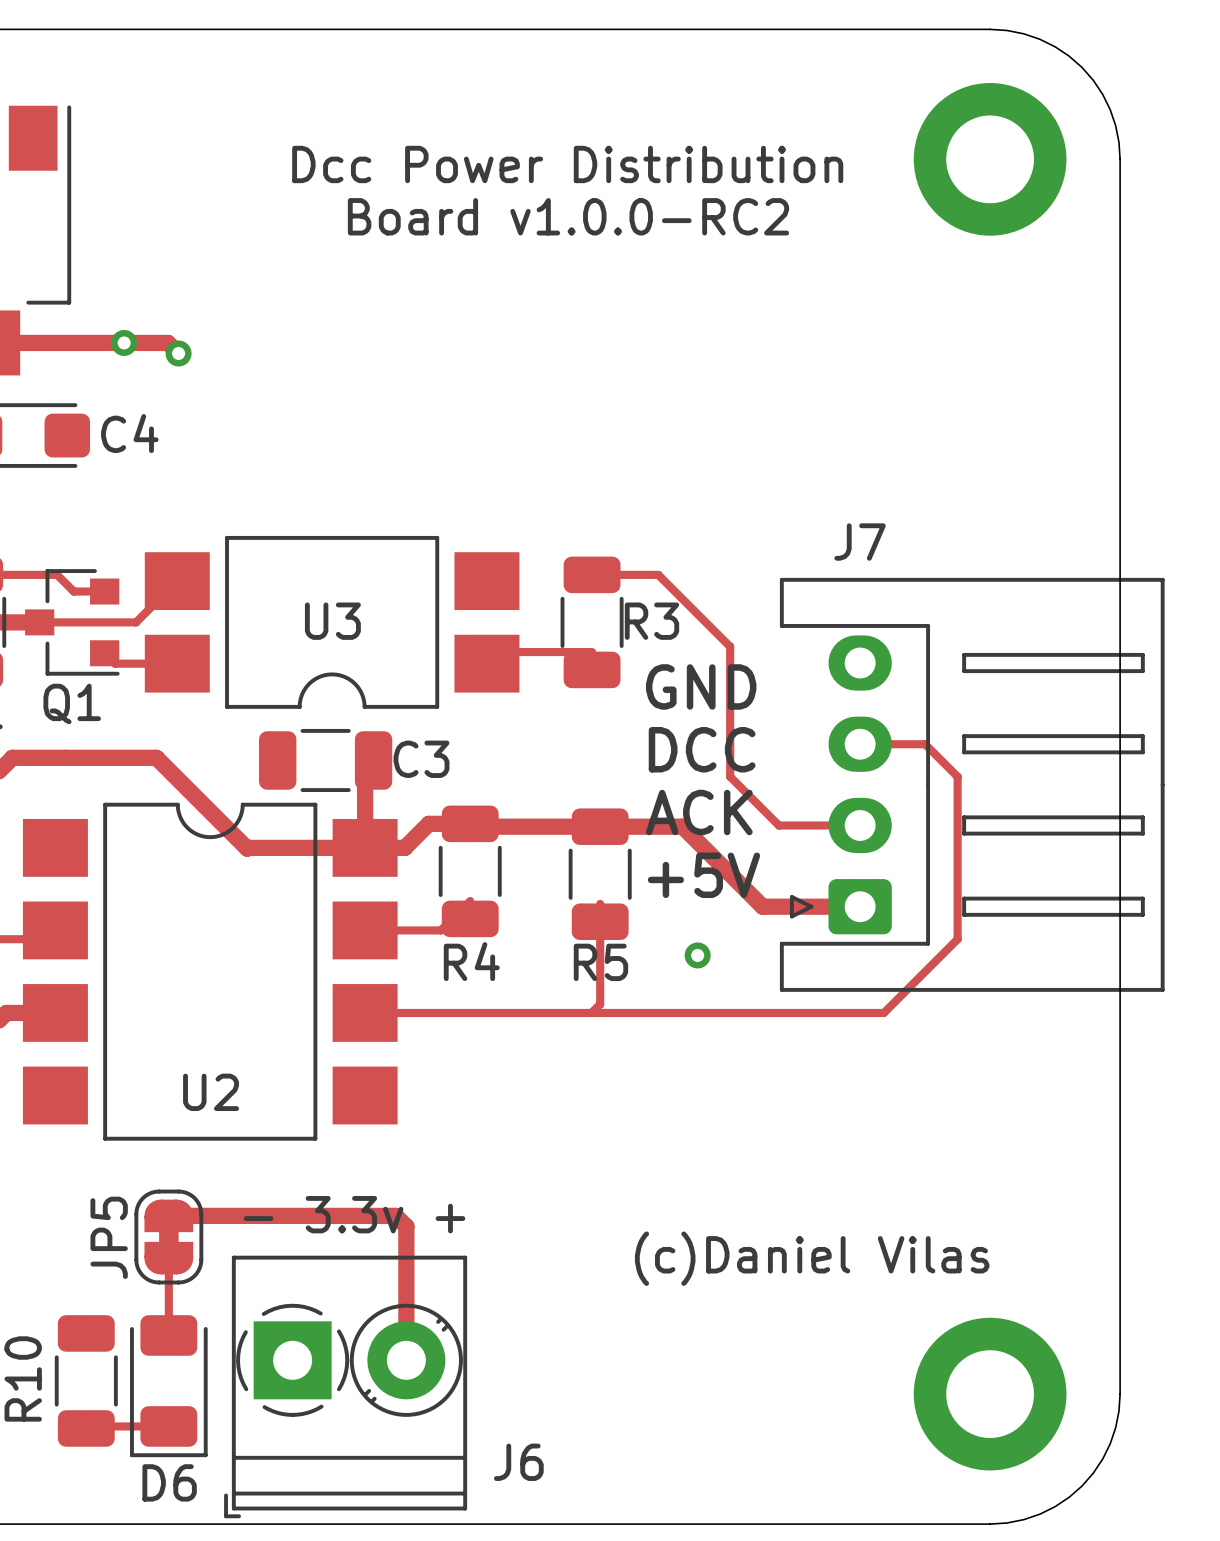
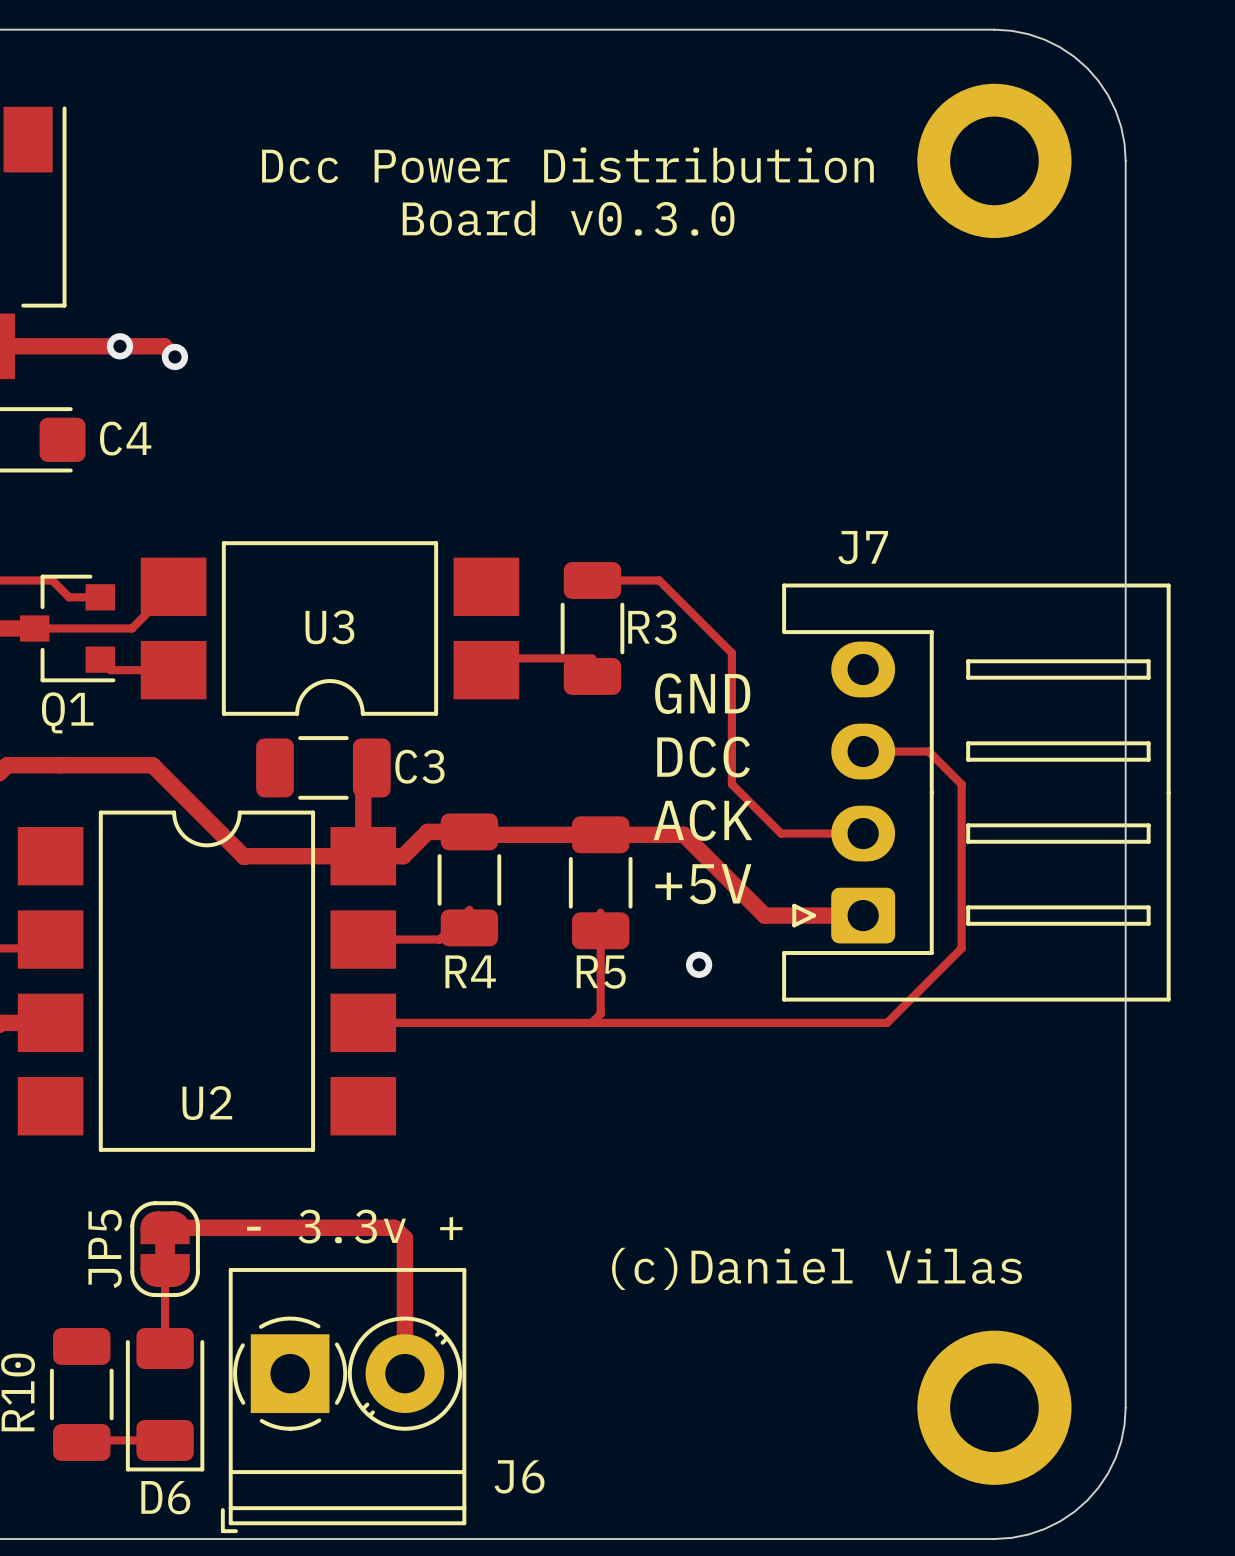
text: Board v1.0.0-RC2 (568, 216) -> Board v0.3.0 (568, 218)

